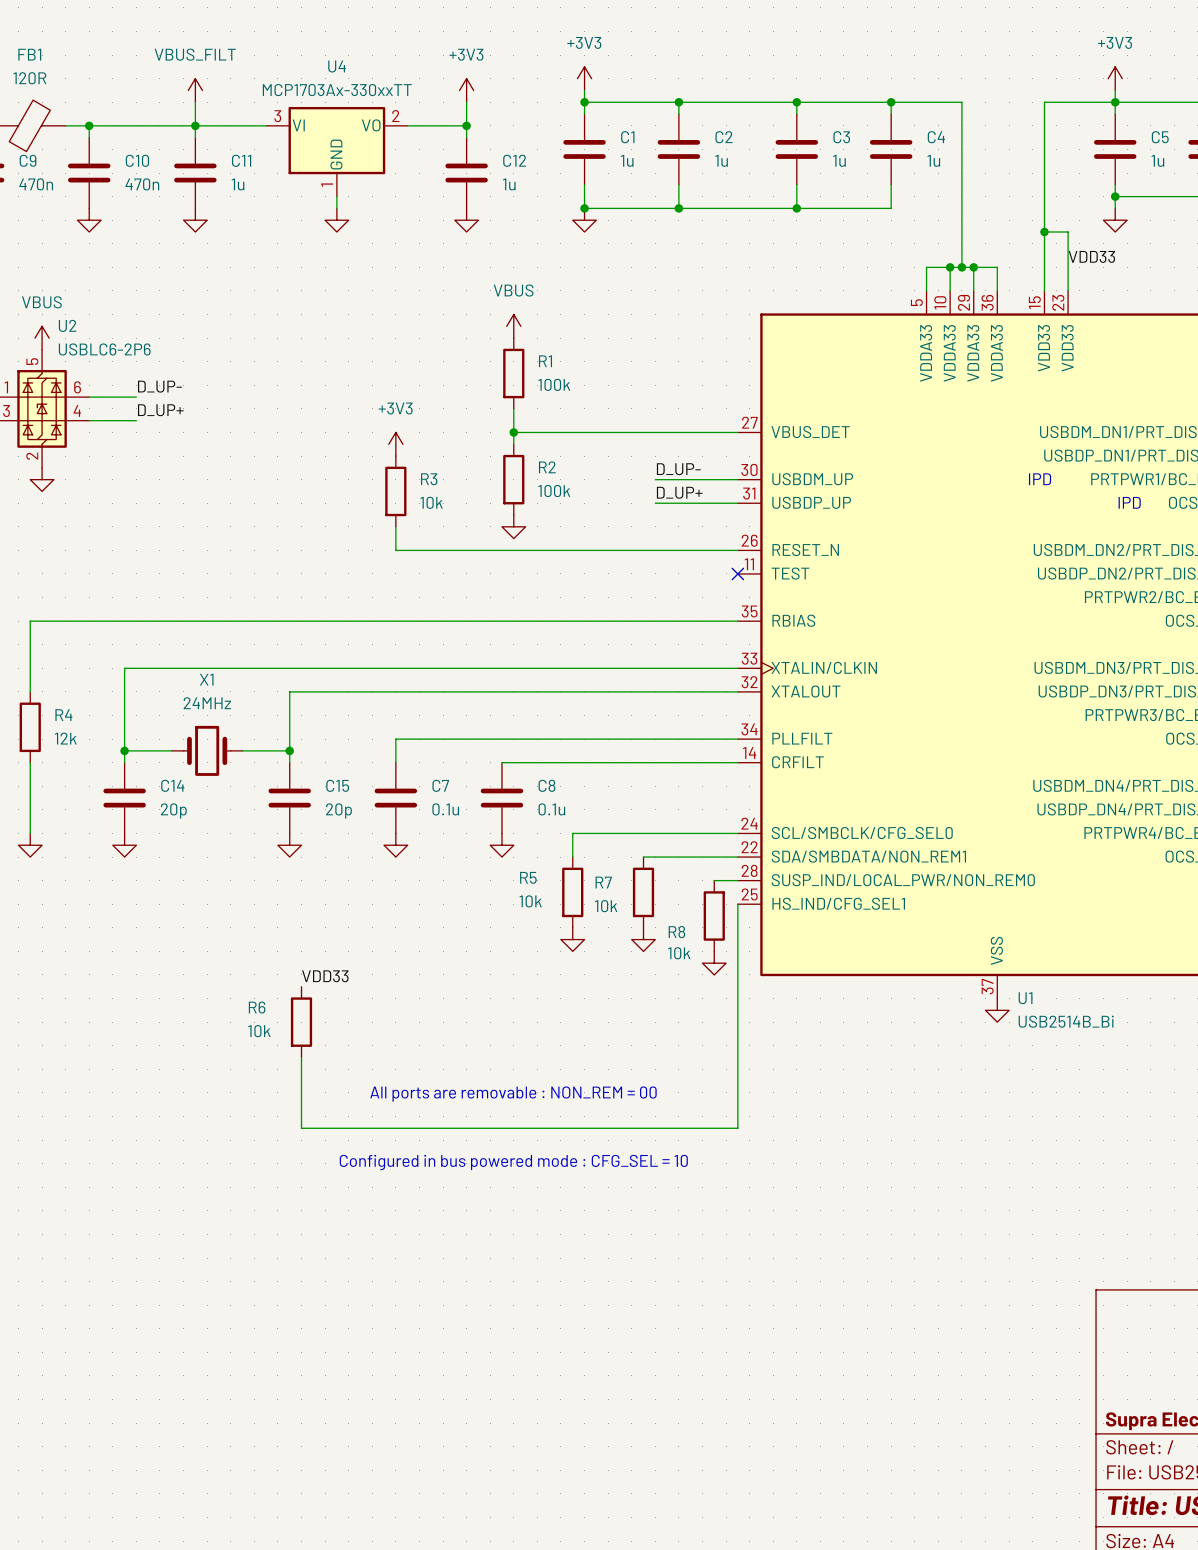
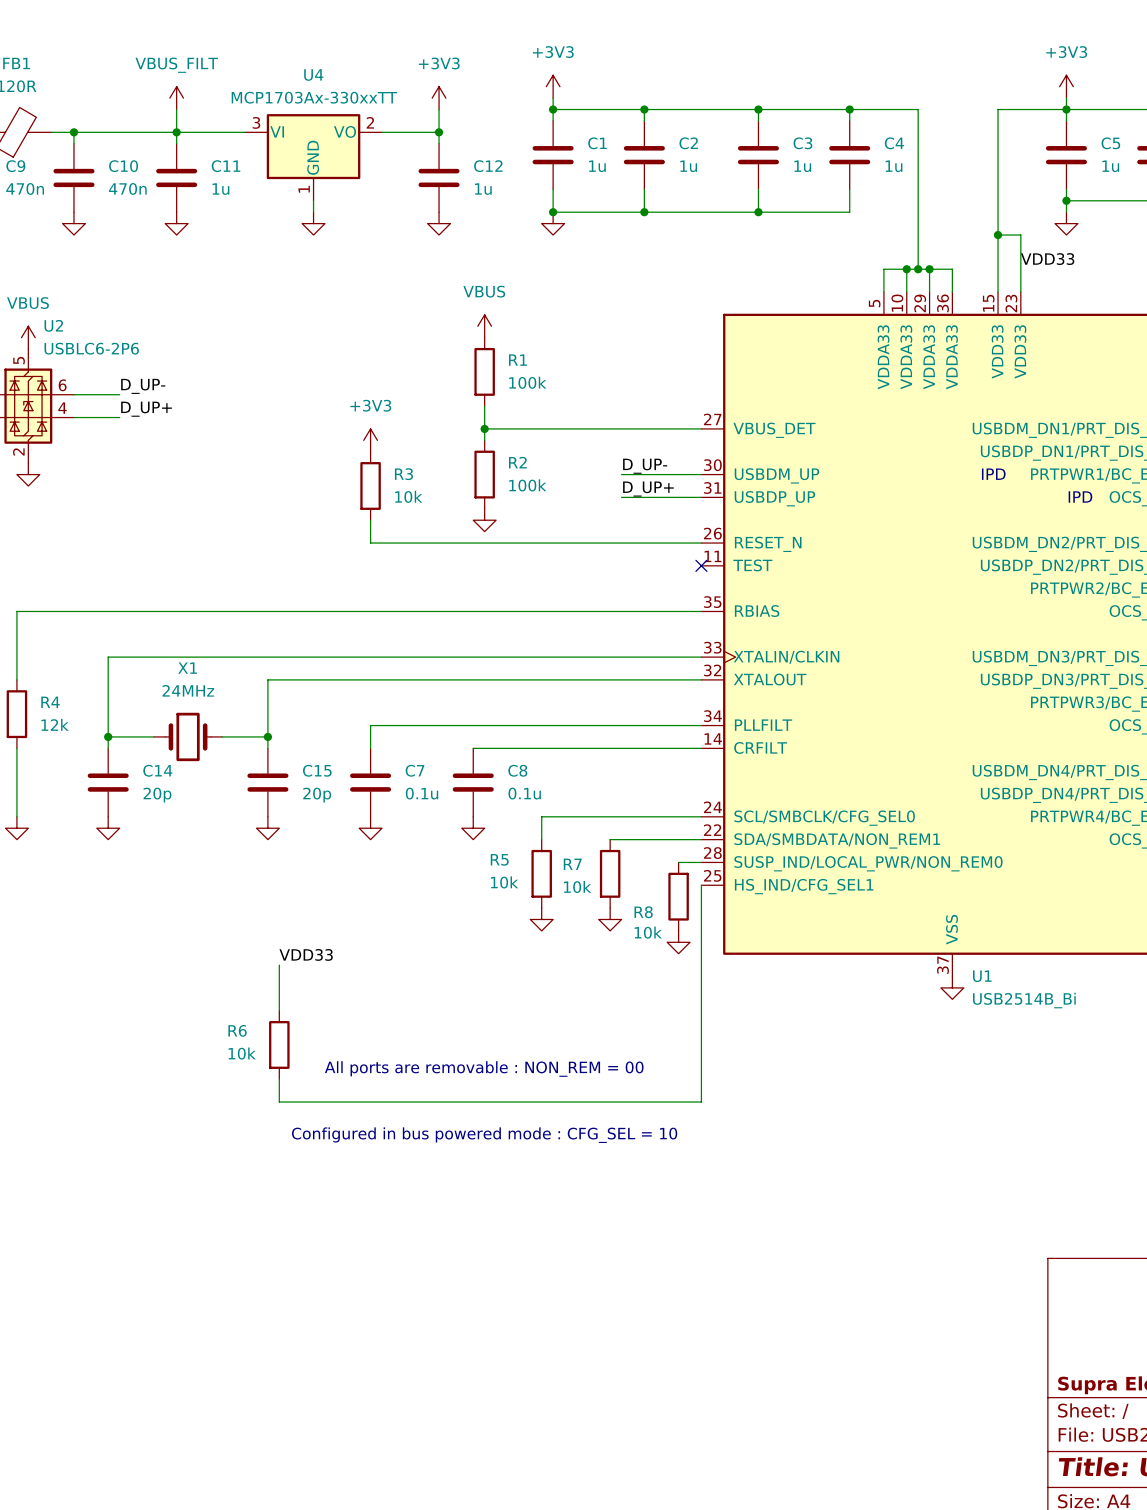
R6 position: (301, 1022) -> (279, 1044)
wire: (301, 1057) (301, 1104) -> (279, 965) (279, 1010)

